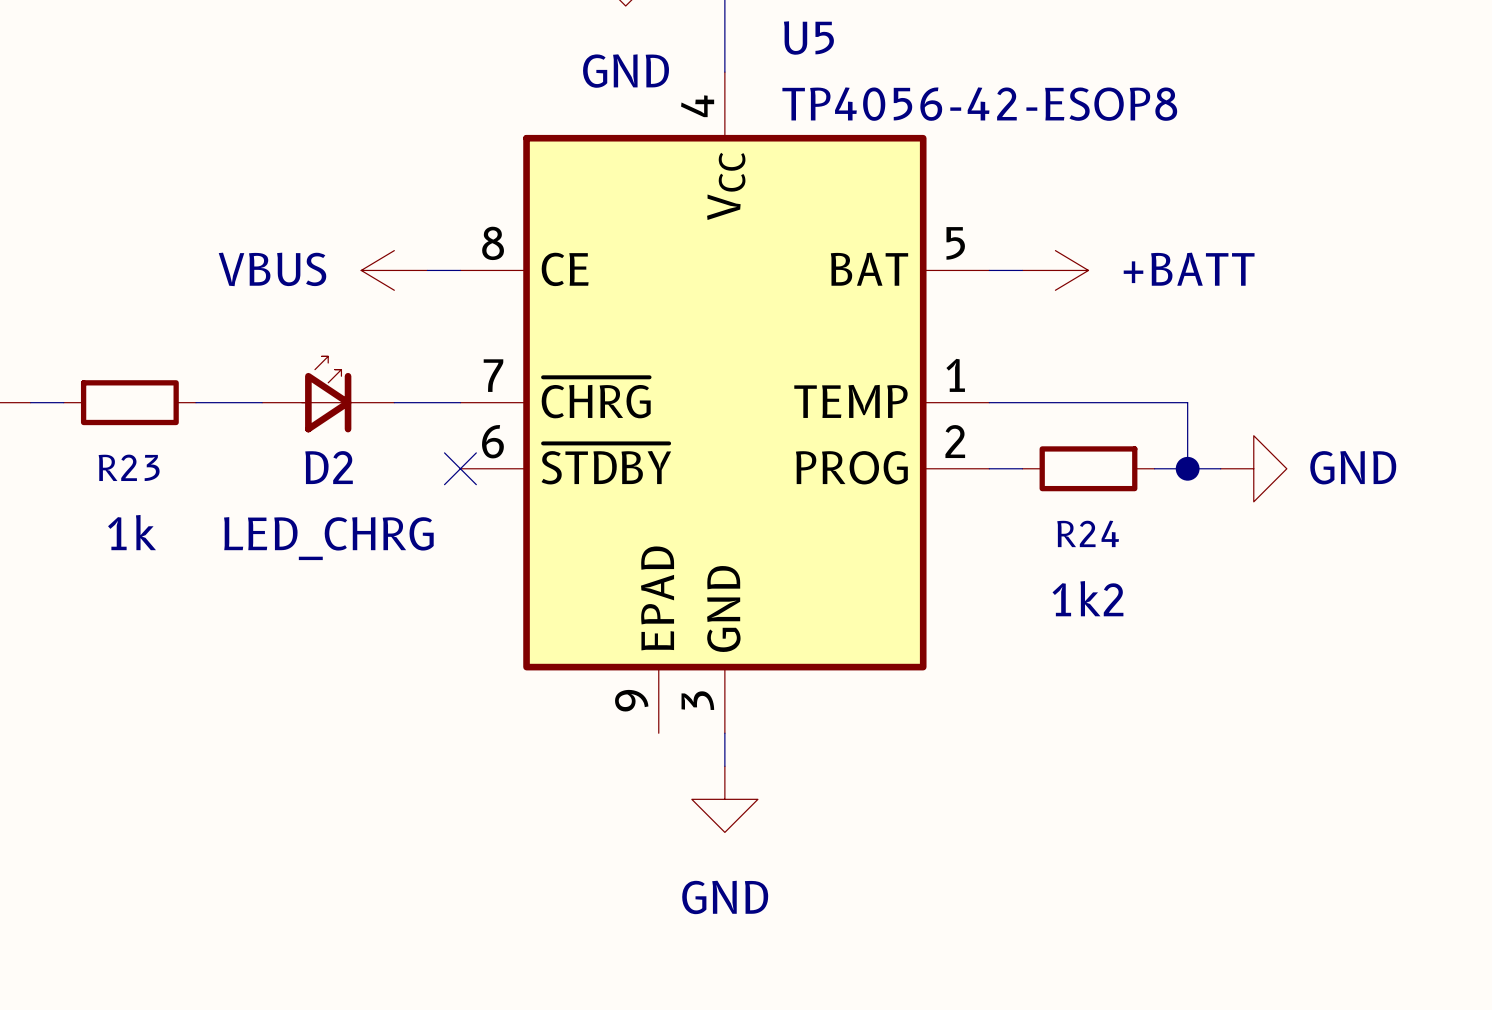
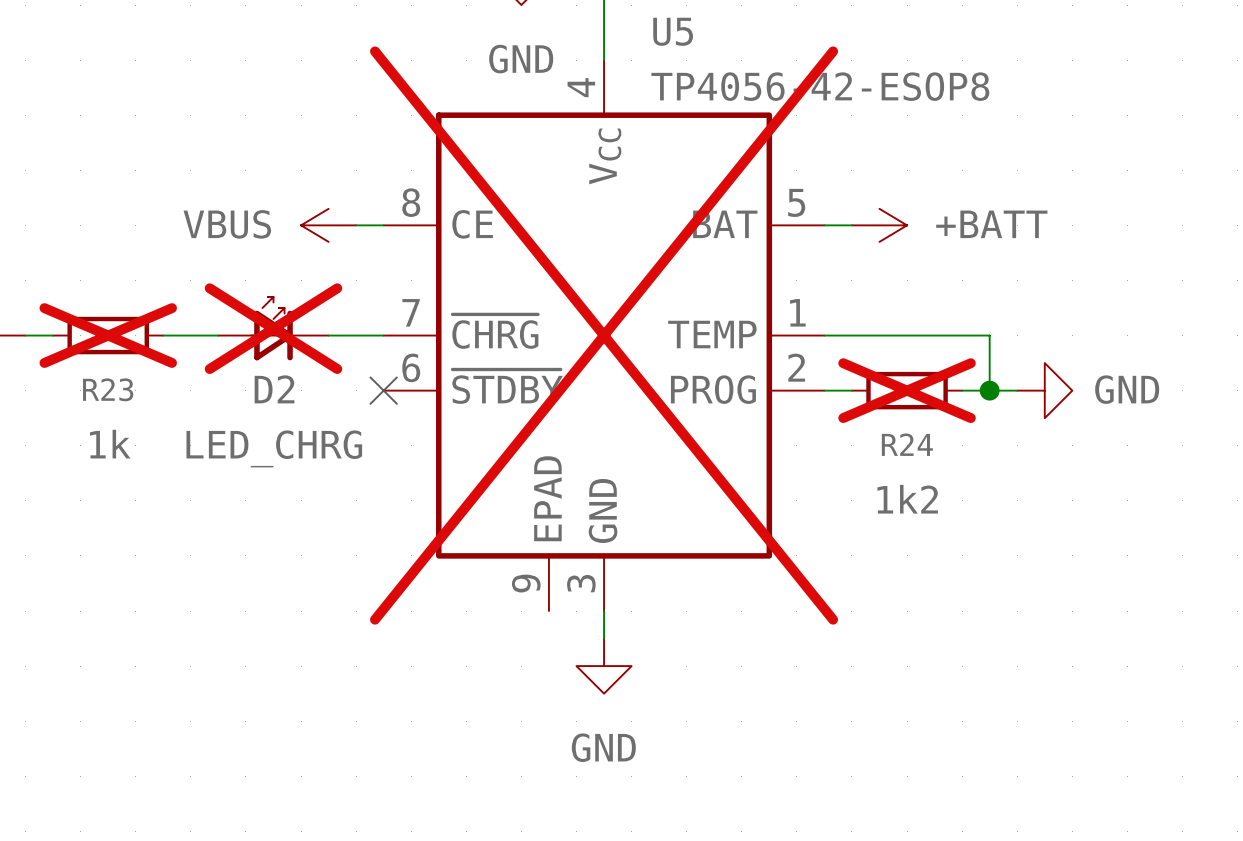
D2 do-not-place cross: none -> (273, 328)
R23 do-not-place cross: none -> (108, 335)
U5 do-not-place cross: none -> (604, 335)
R24 do-not-place cross: none -> (907, 390)

